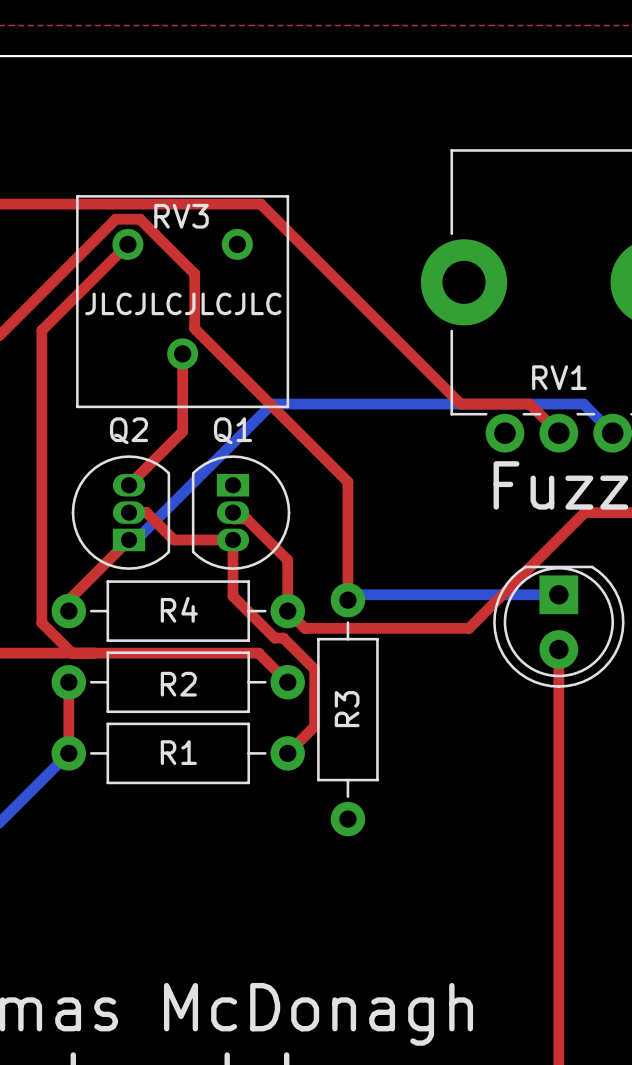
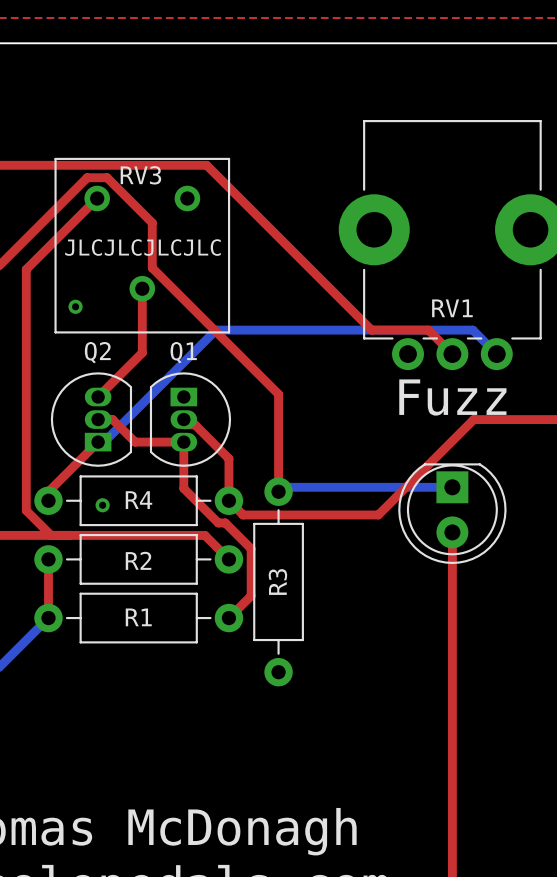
via: none -> (75, 306)
via: none -> (102, 505)

